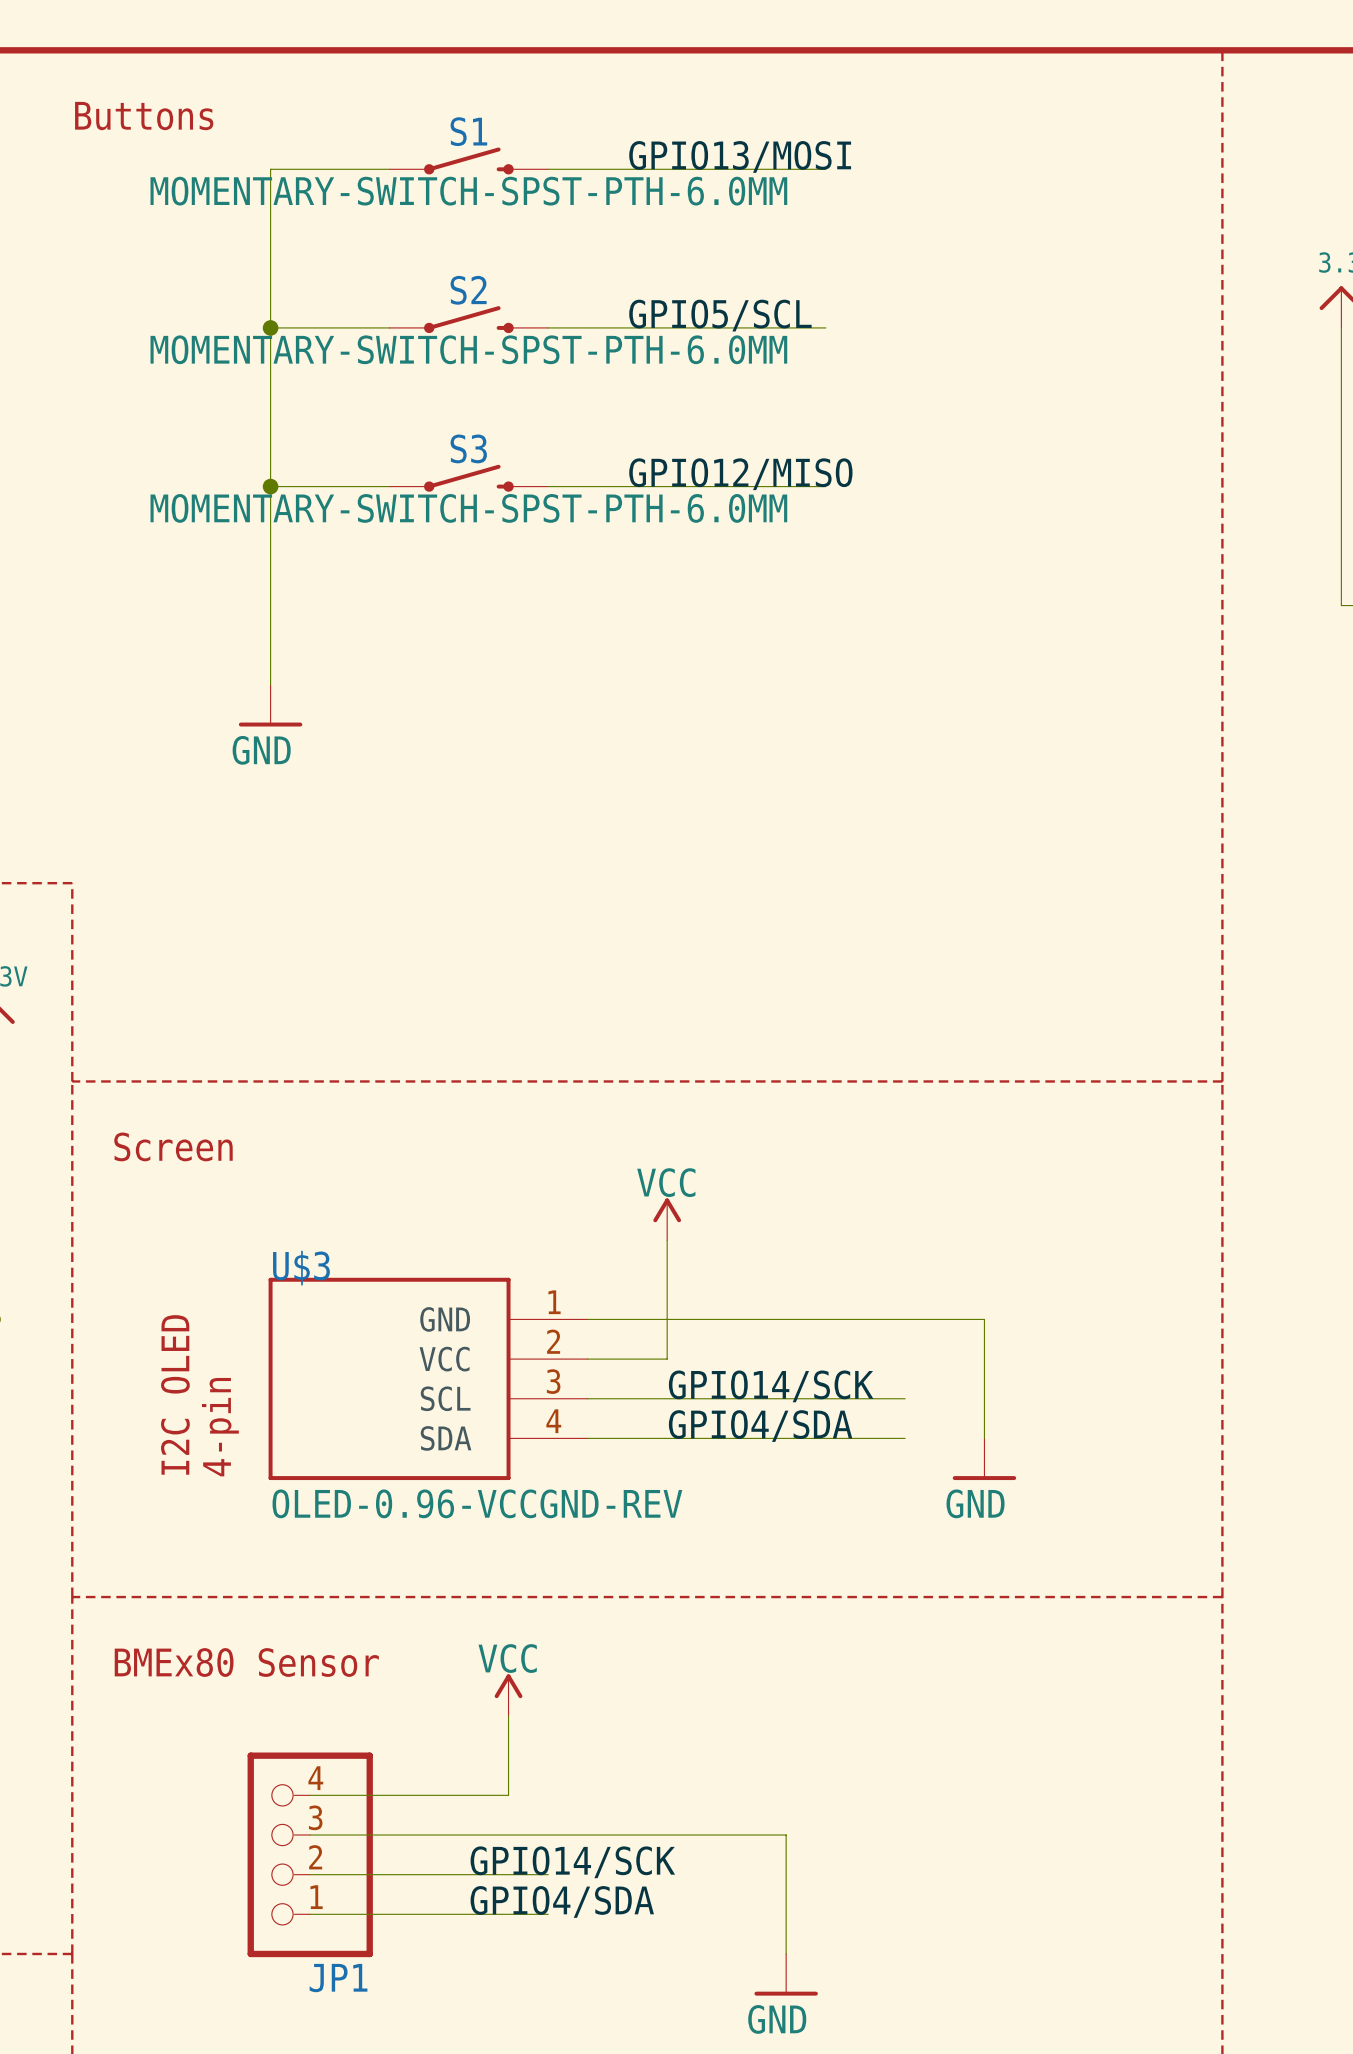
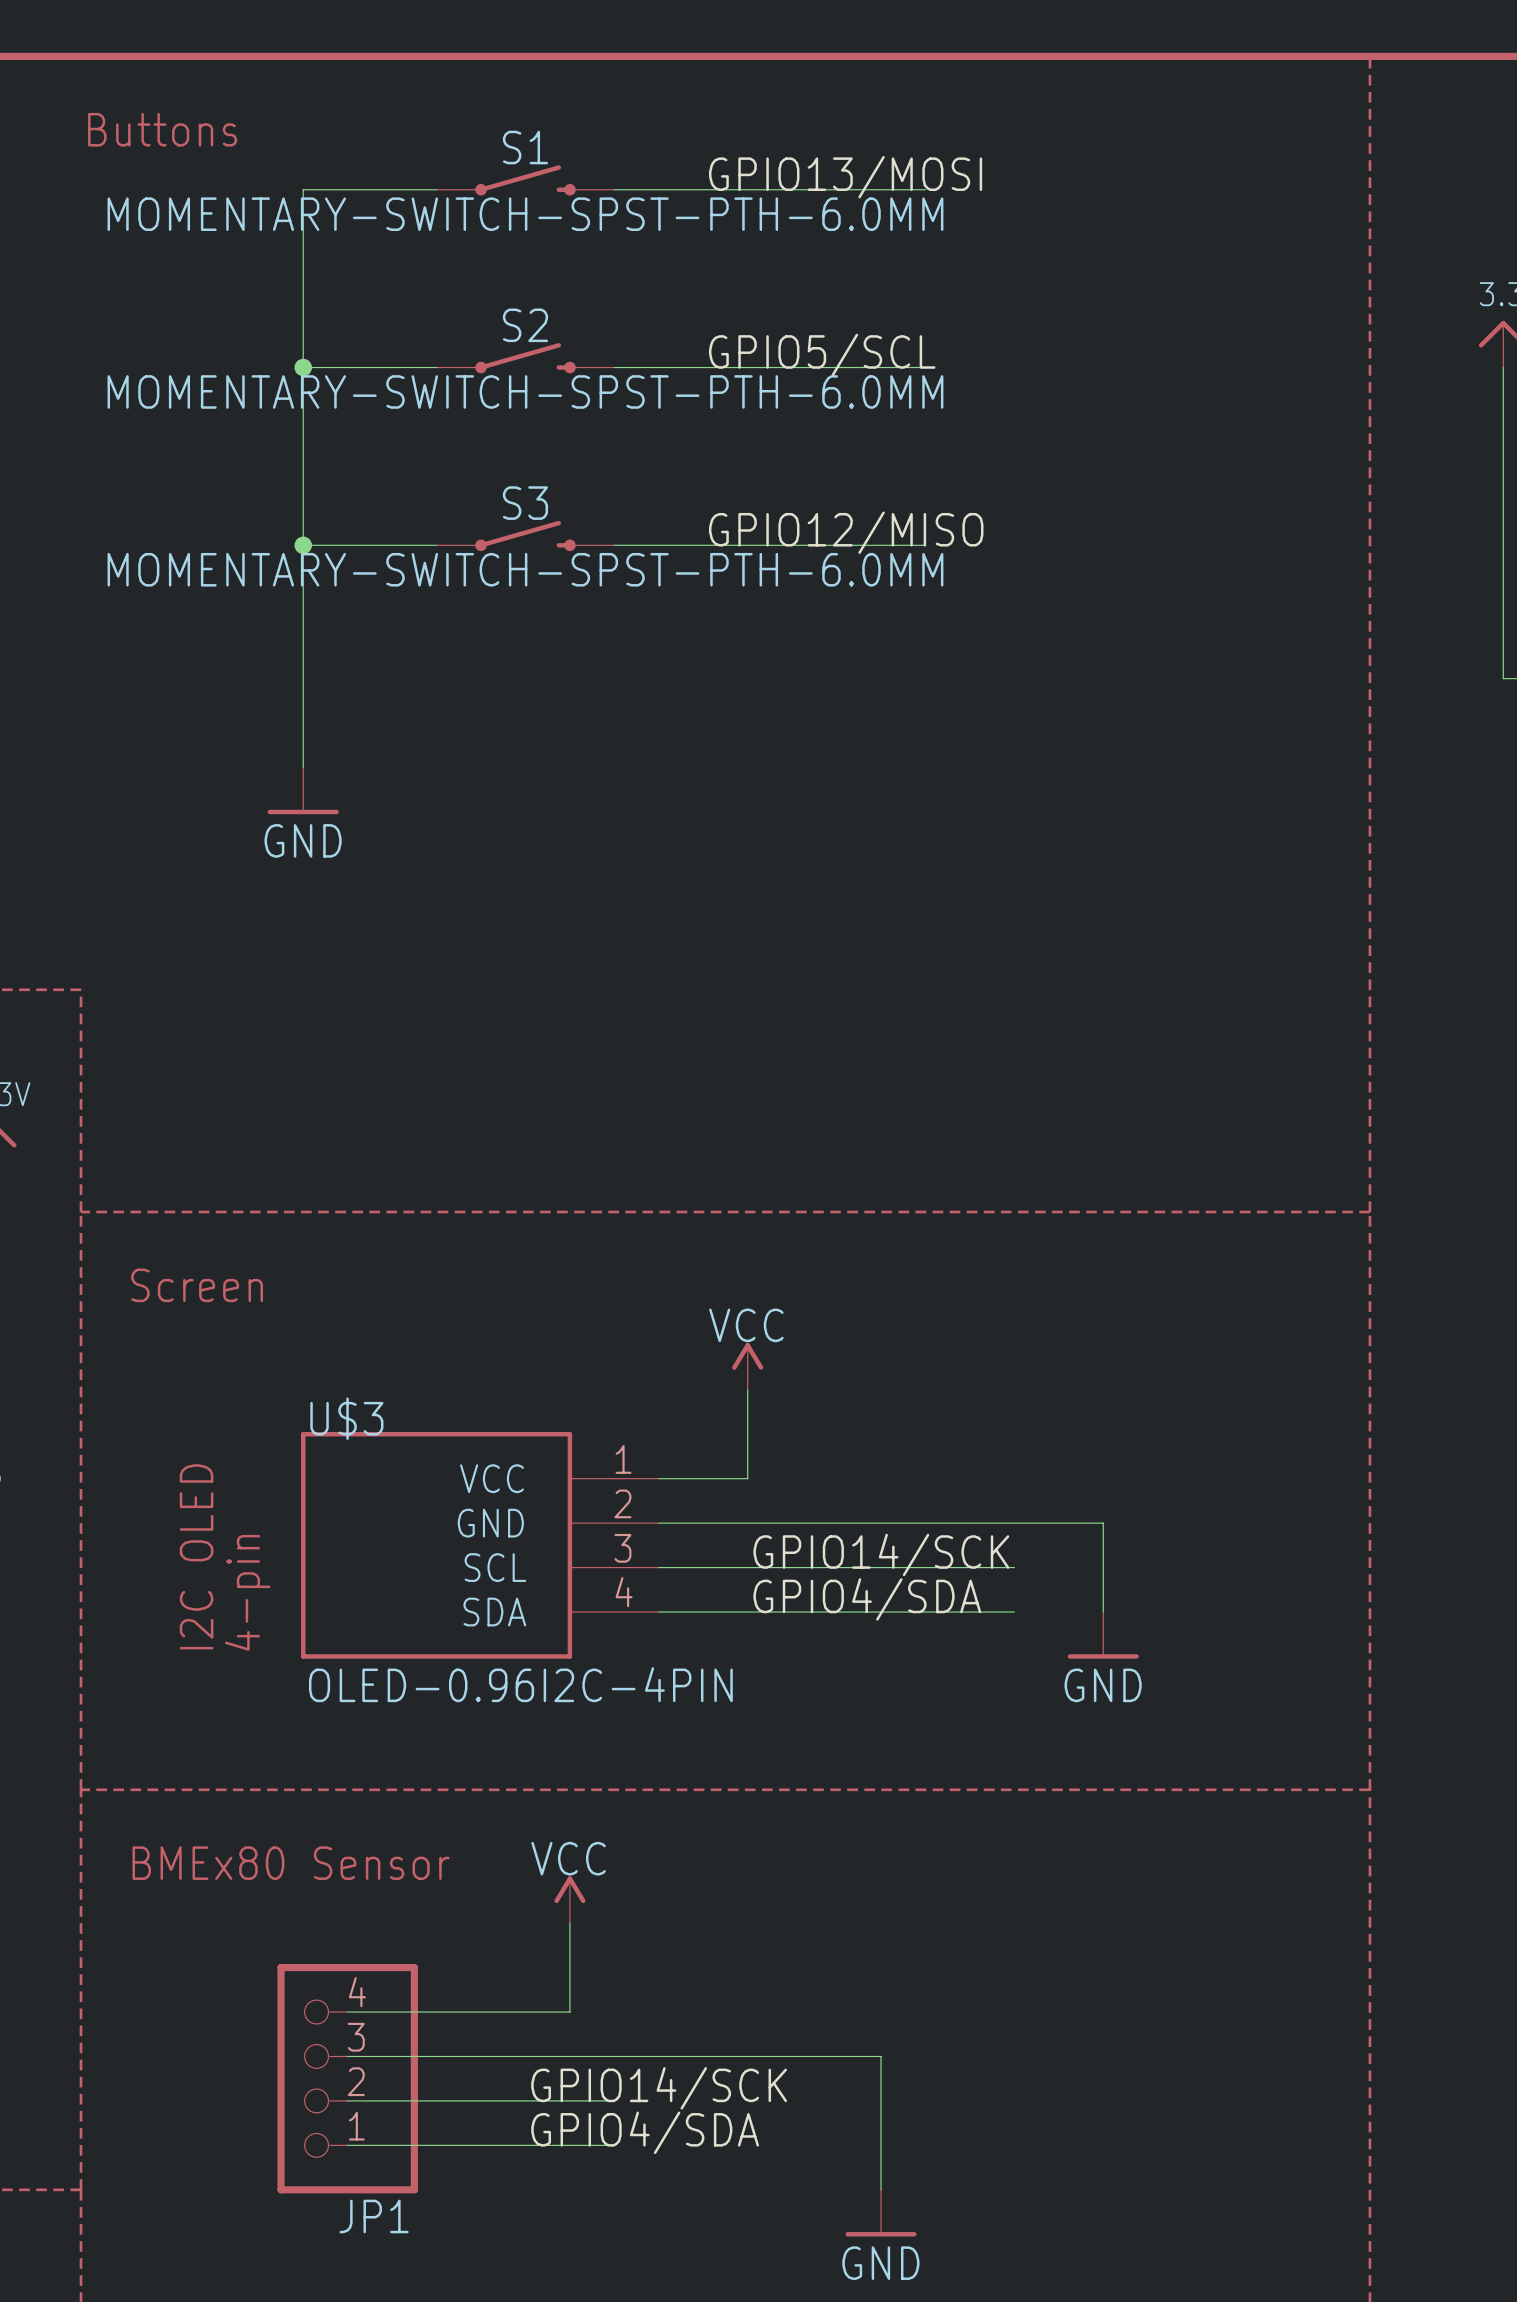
U$3 pin name: GND (445, 1319) -> VCC (491, 1478)
U$3 pin name: VCC (444, 1359) -> GND (490, 1523)
wire: (667, 1359) (667, 1319) (984, 1319) (984, 1359) -> (747, 1523) (1103, 1523)
U$3 value: OLED-0.96-VCCGND-REV (477, 1503) -> OLED-0.96I2C-4PIN (520, 1684)

